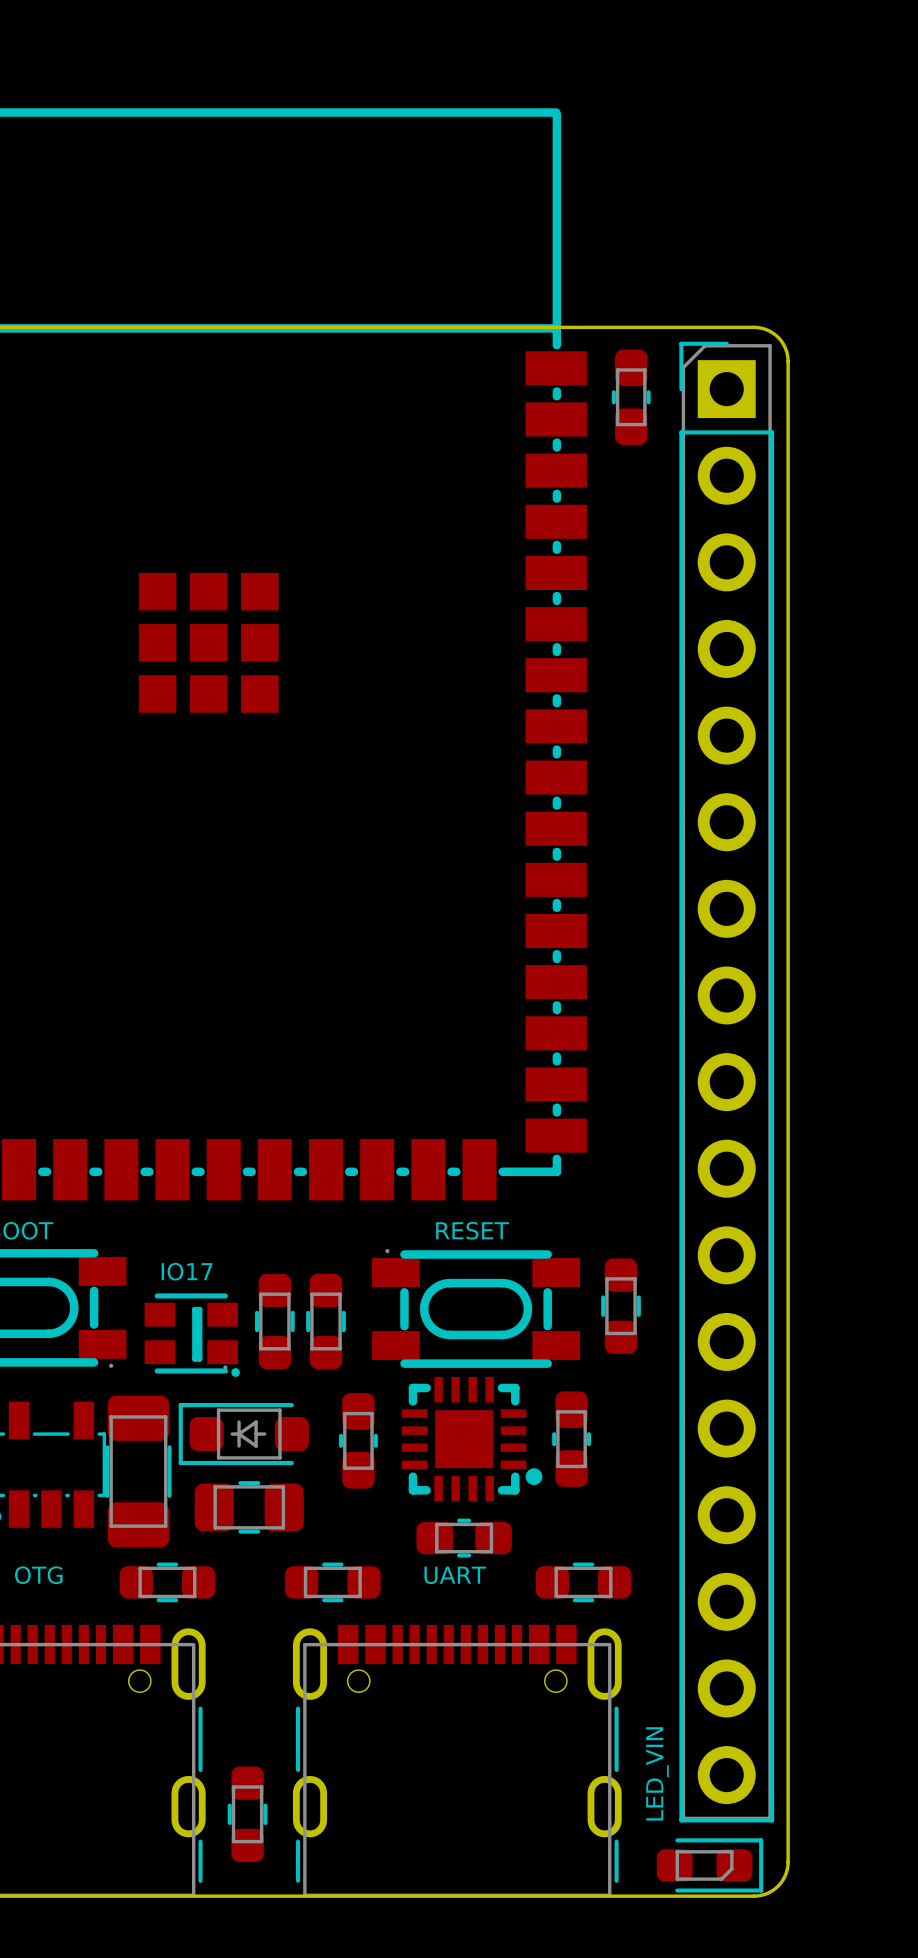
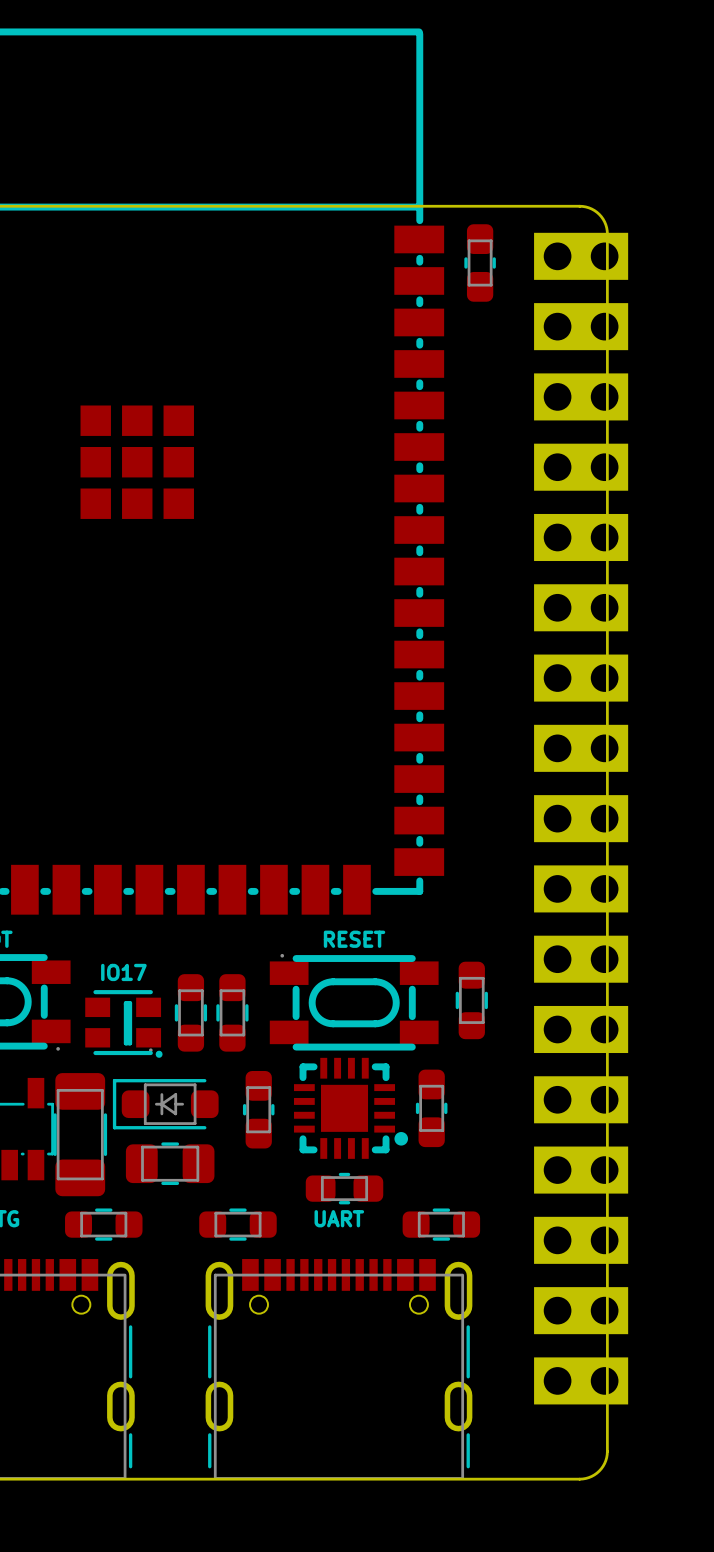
part footprint: [679, 341, 775, 1823] -> [534, 232, 629, 1405]
text: LED_VIN (657, 1773) -> none
part: (247, 1814) -> none
part: (710, 1865) -> none

